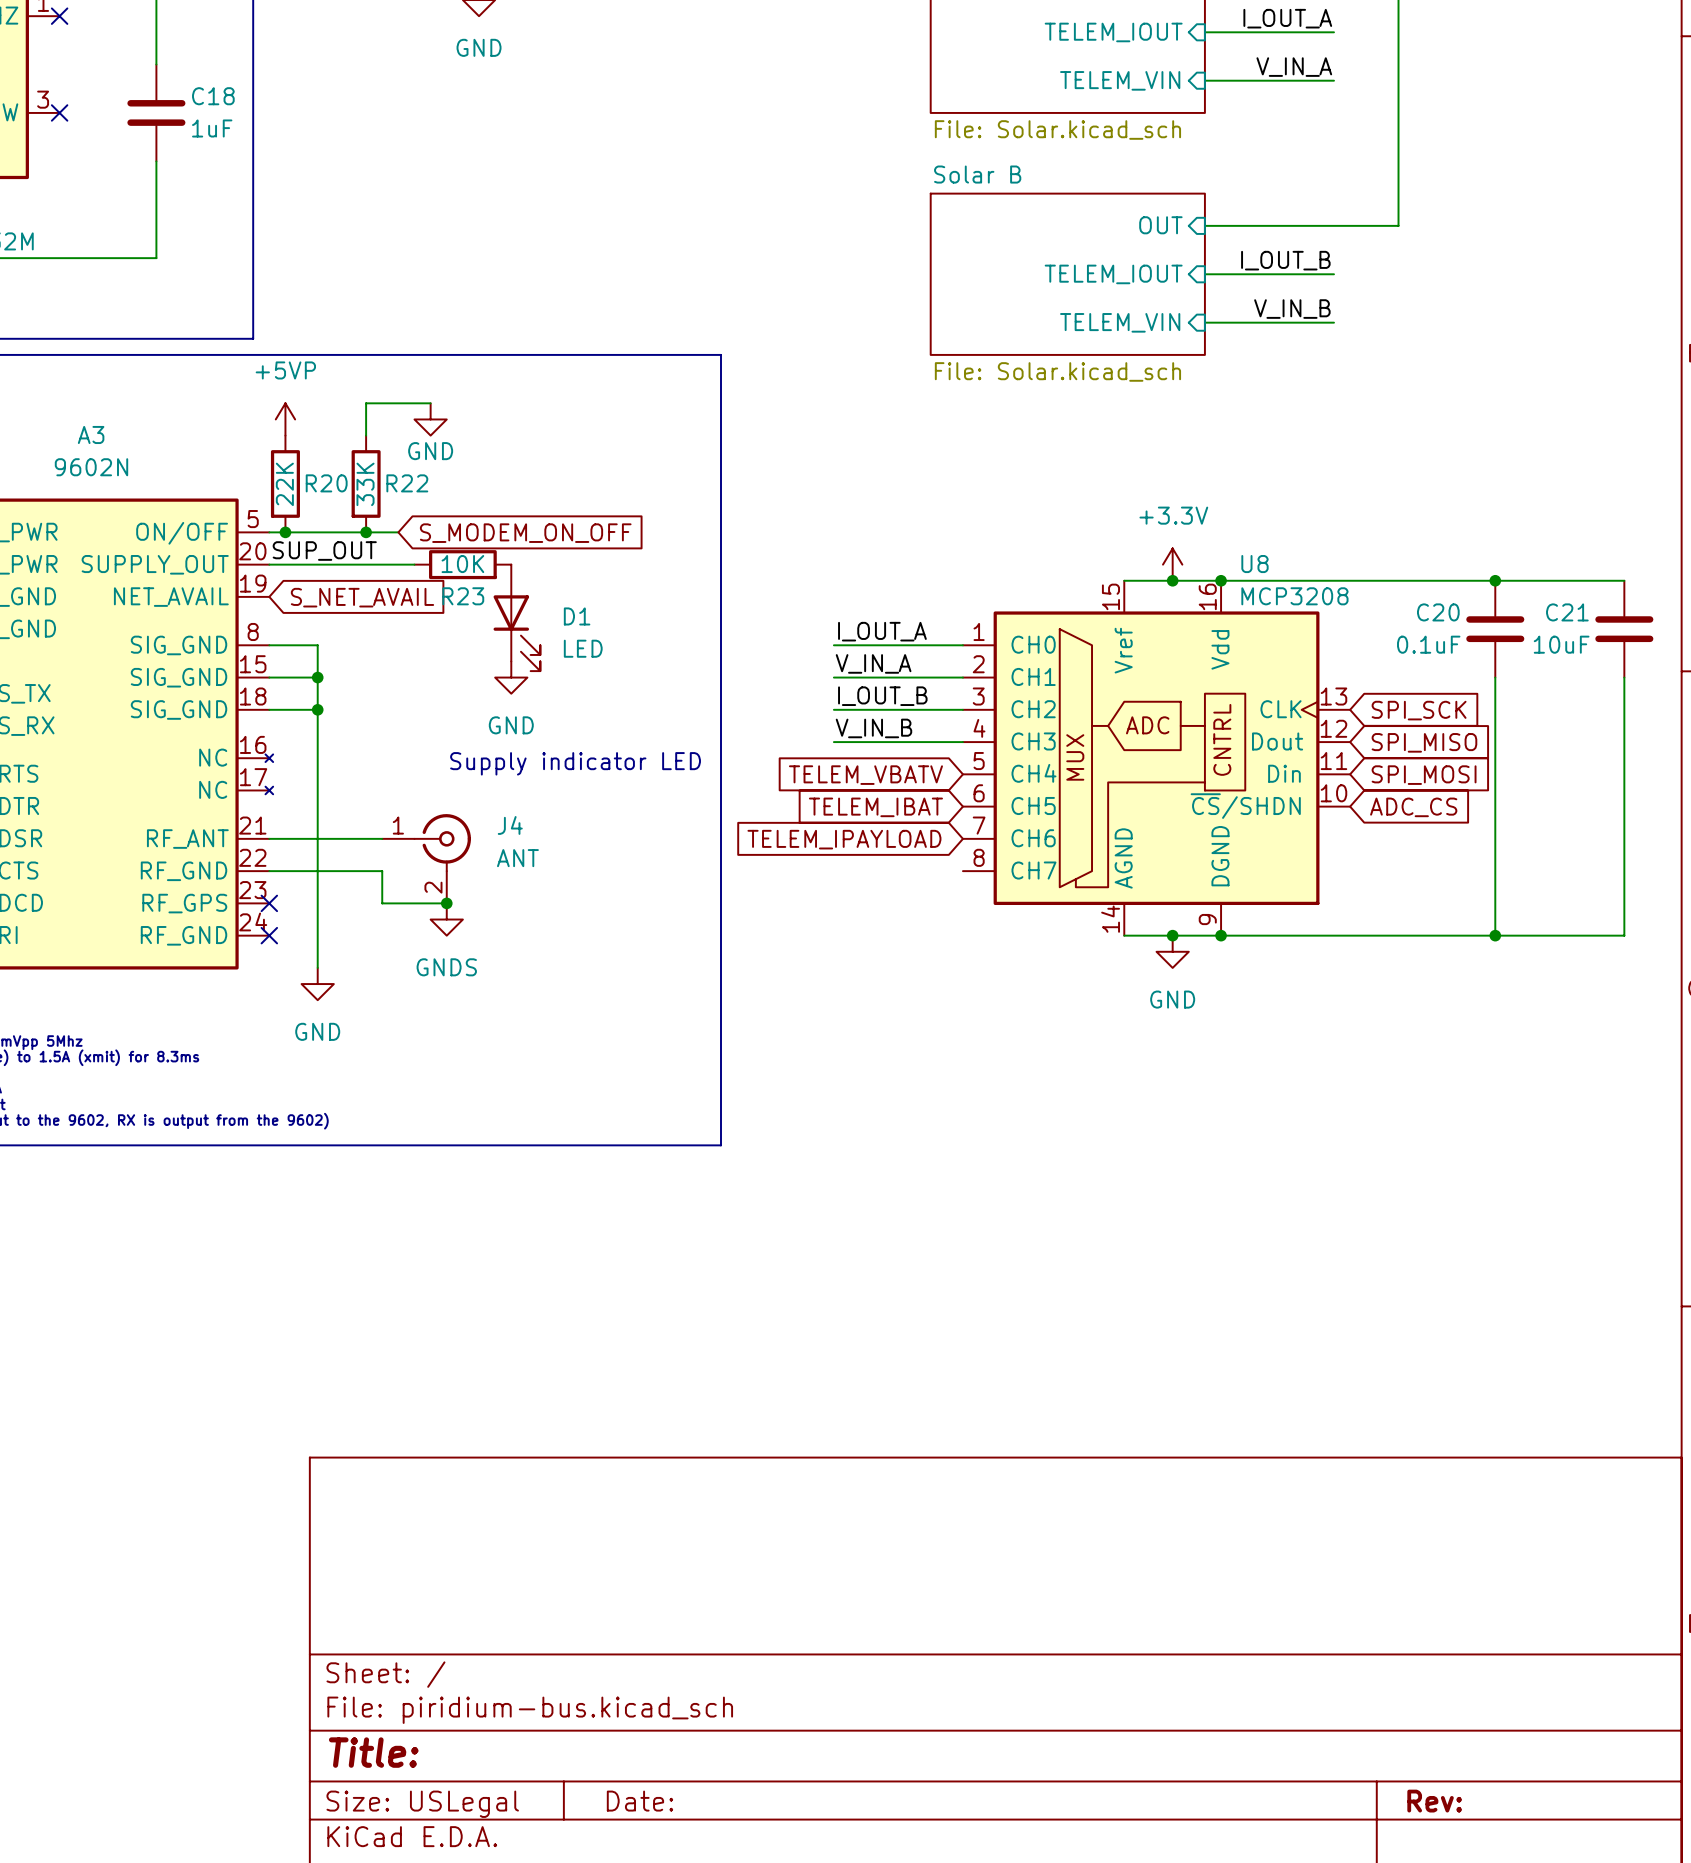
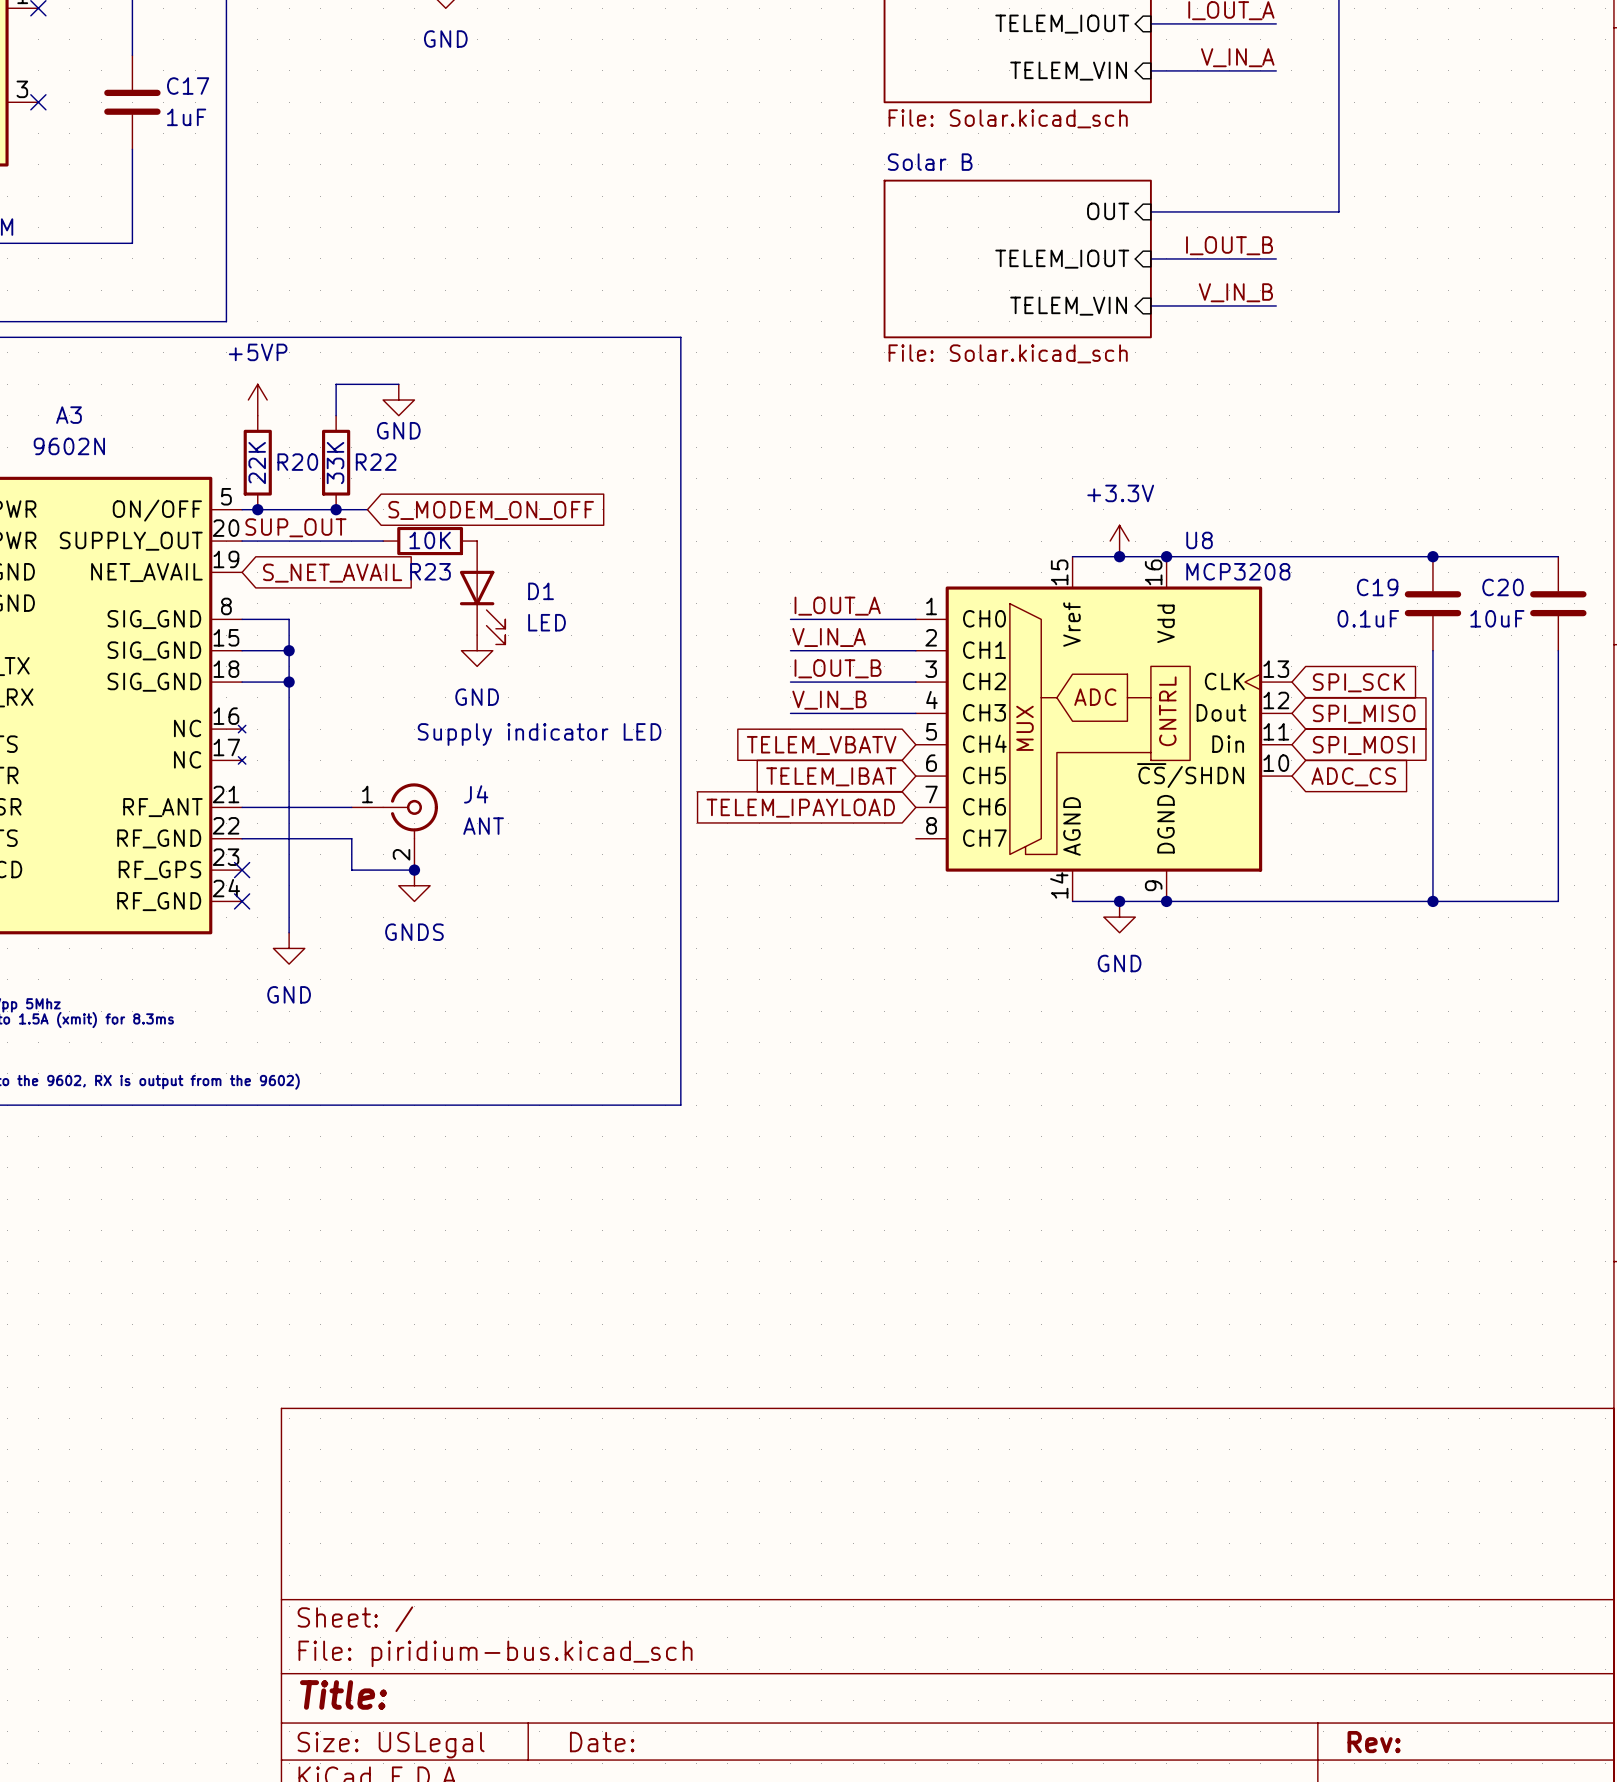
C18 name: C18 (213, 96) -> C17 (188, 86)
C20 name: C20 (1438, 612) -> C19 (1377, 587)
C21 name: C21 (1567, 612) -> C20 (1502, 587)

